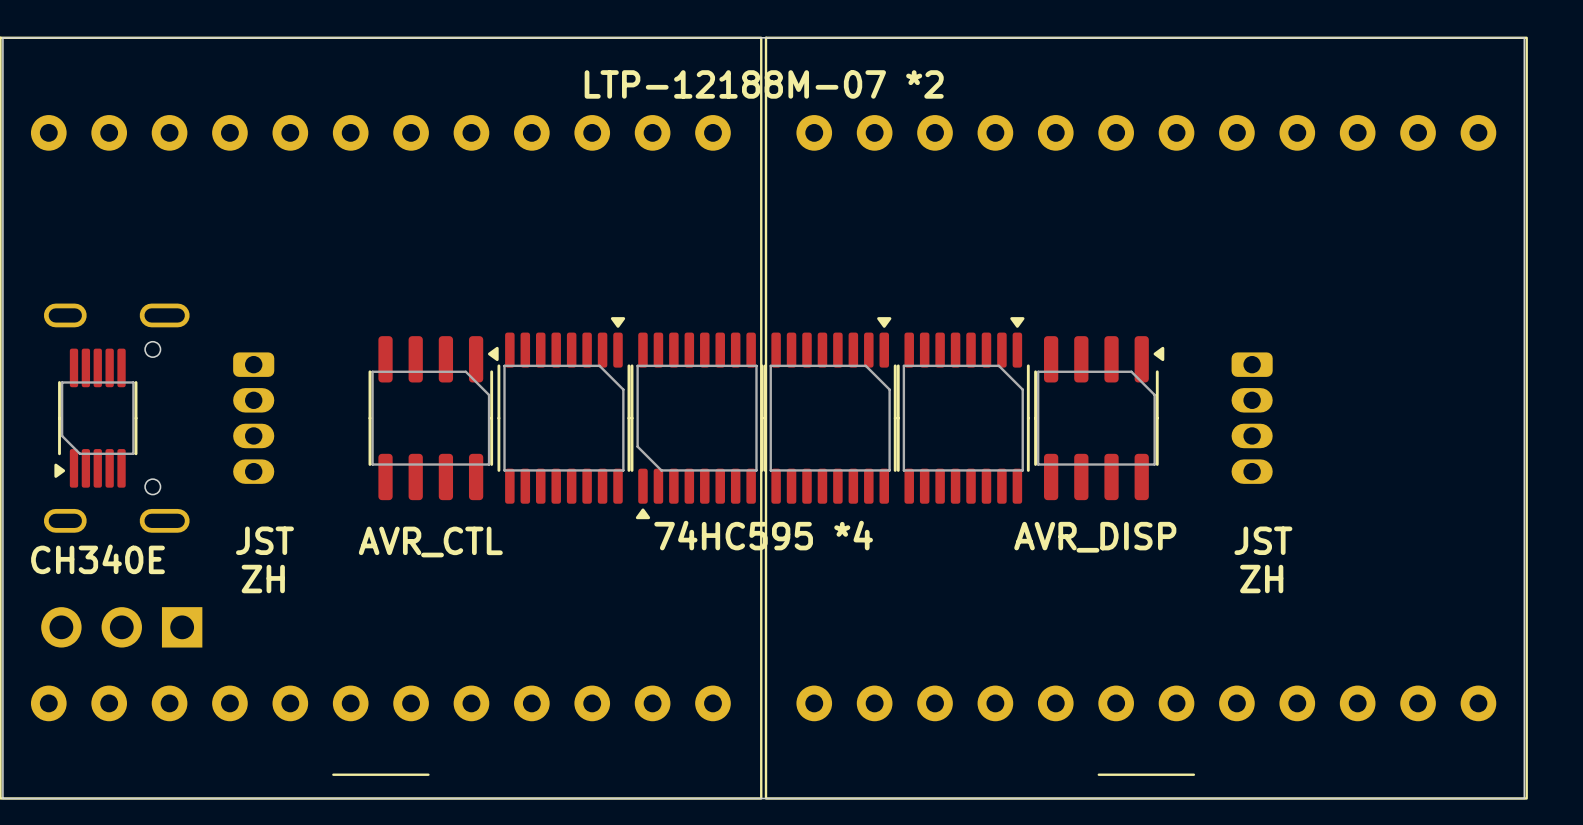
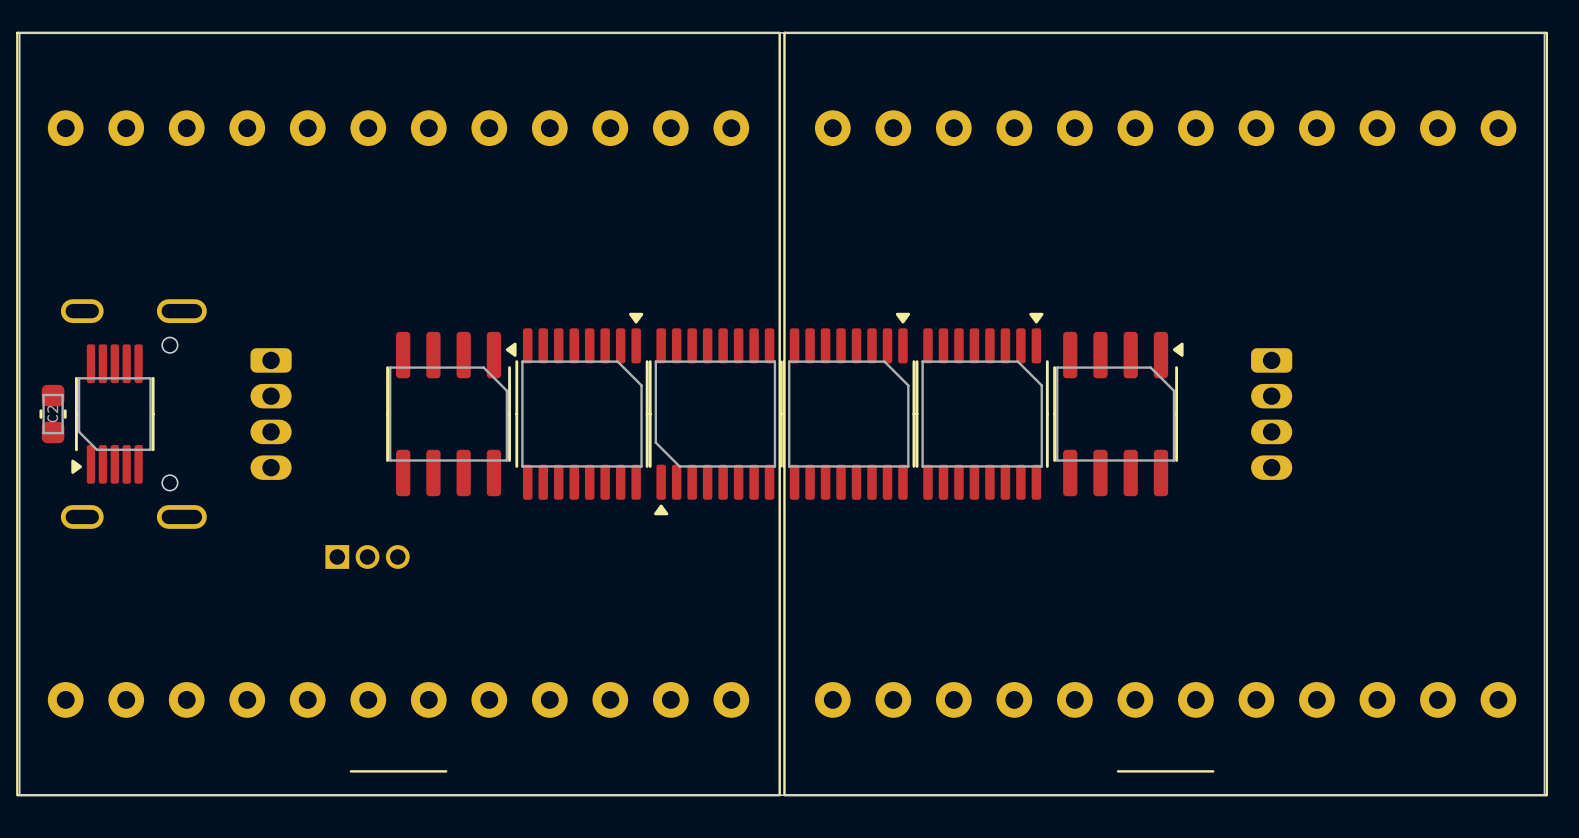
text: LTP-12188M-07 *2 (764, 84) -> none
C2: none -> (53, 414)
text: 74HC595 *4 (763, 535) -> none
text: AVR_DISP (1095, 537) -> none
text: JST (264, 540) -> none
text: JST (1263, 540) -> none
text: AVR_CTL (430, 542) -> none
text: CH340E (98, 559) -> none
part: none -> (367, 556)
text: ZH (263, 579) -> none
text: ZH (1261, 579) -> none
part: (121, 627) -> none

